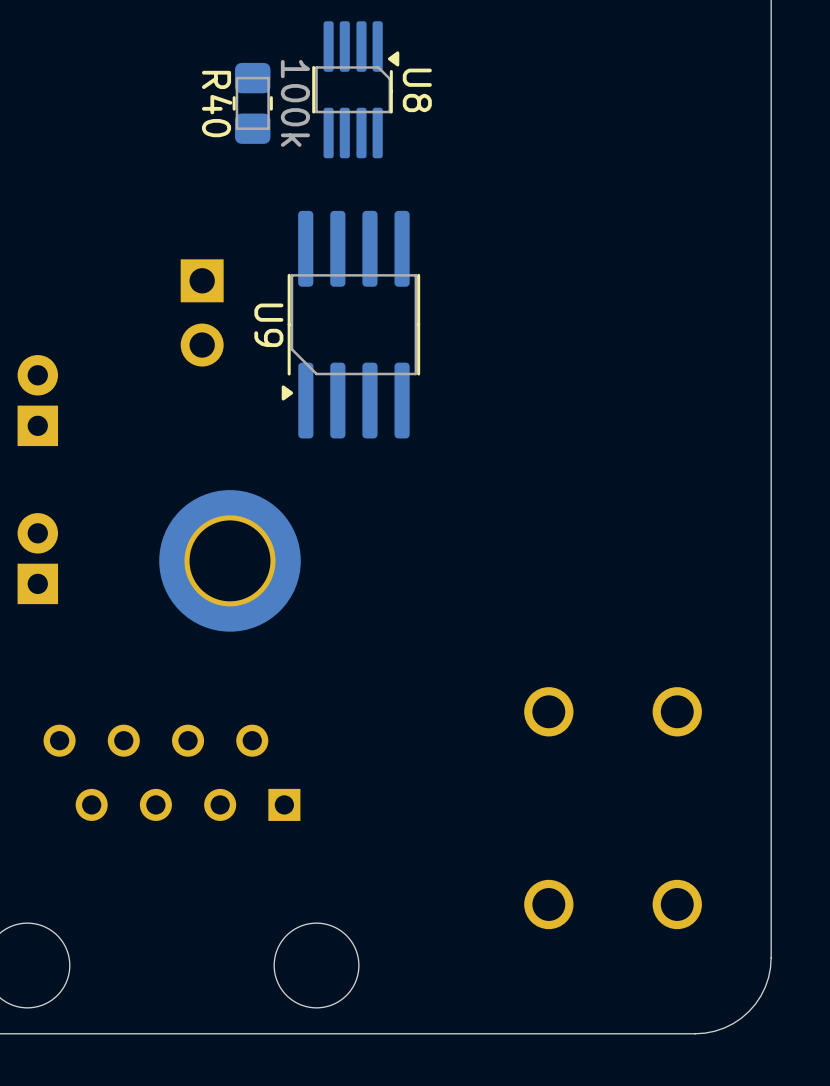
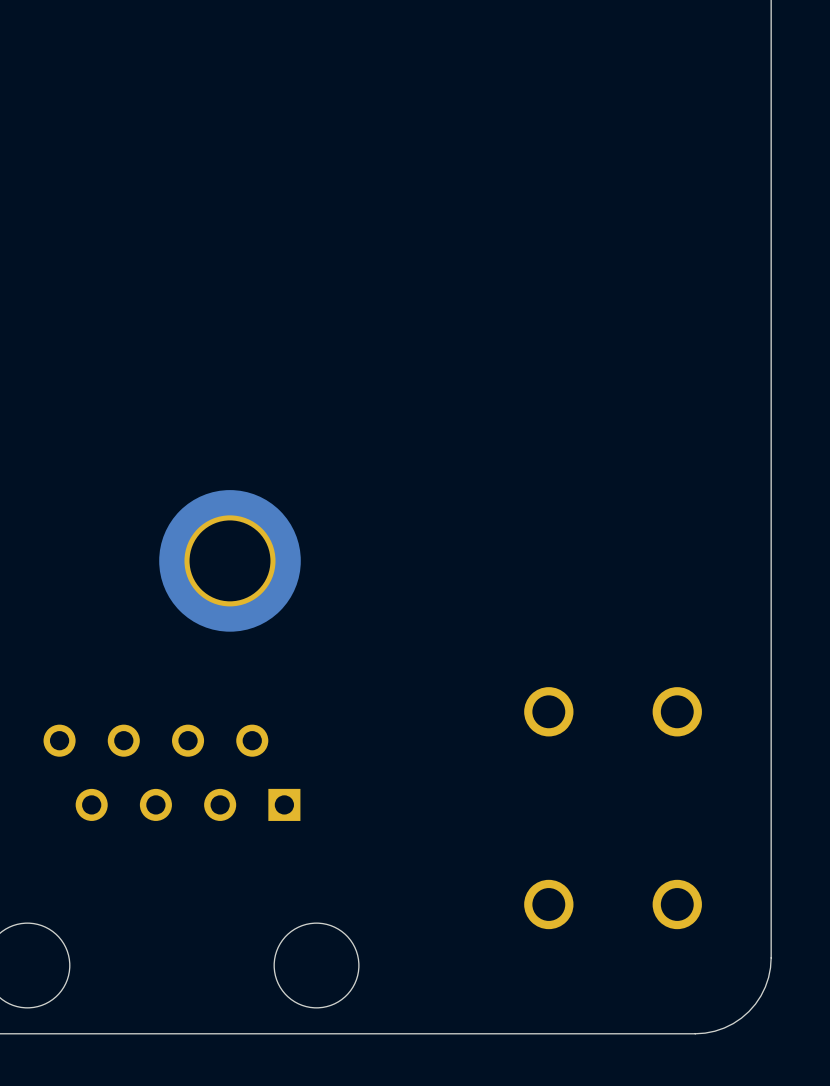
U8: (355, 89) -> none
R40: 100k (252, 103) -> none
part: (202, 312) -> none
U9: (350, 324) -> none
part: (37, 400) -> none
part: (37, 558) -> none

